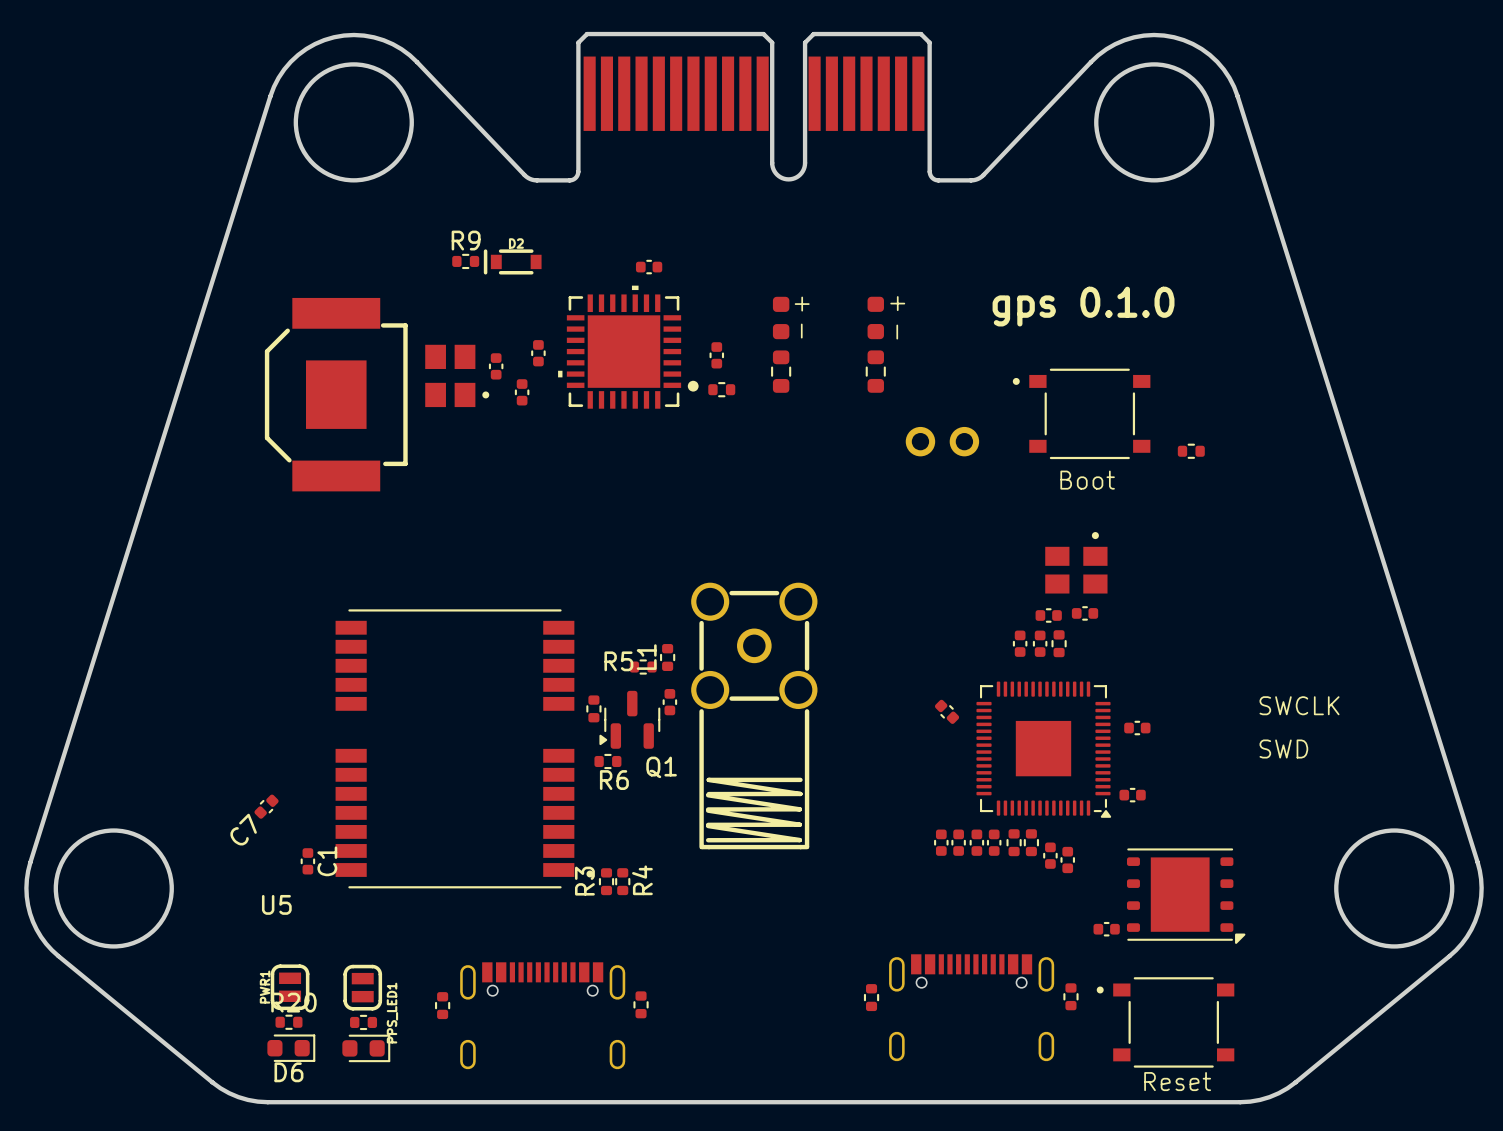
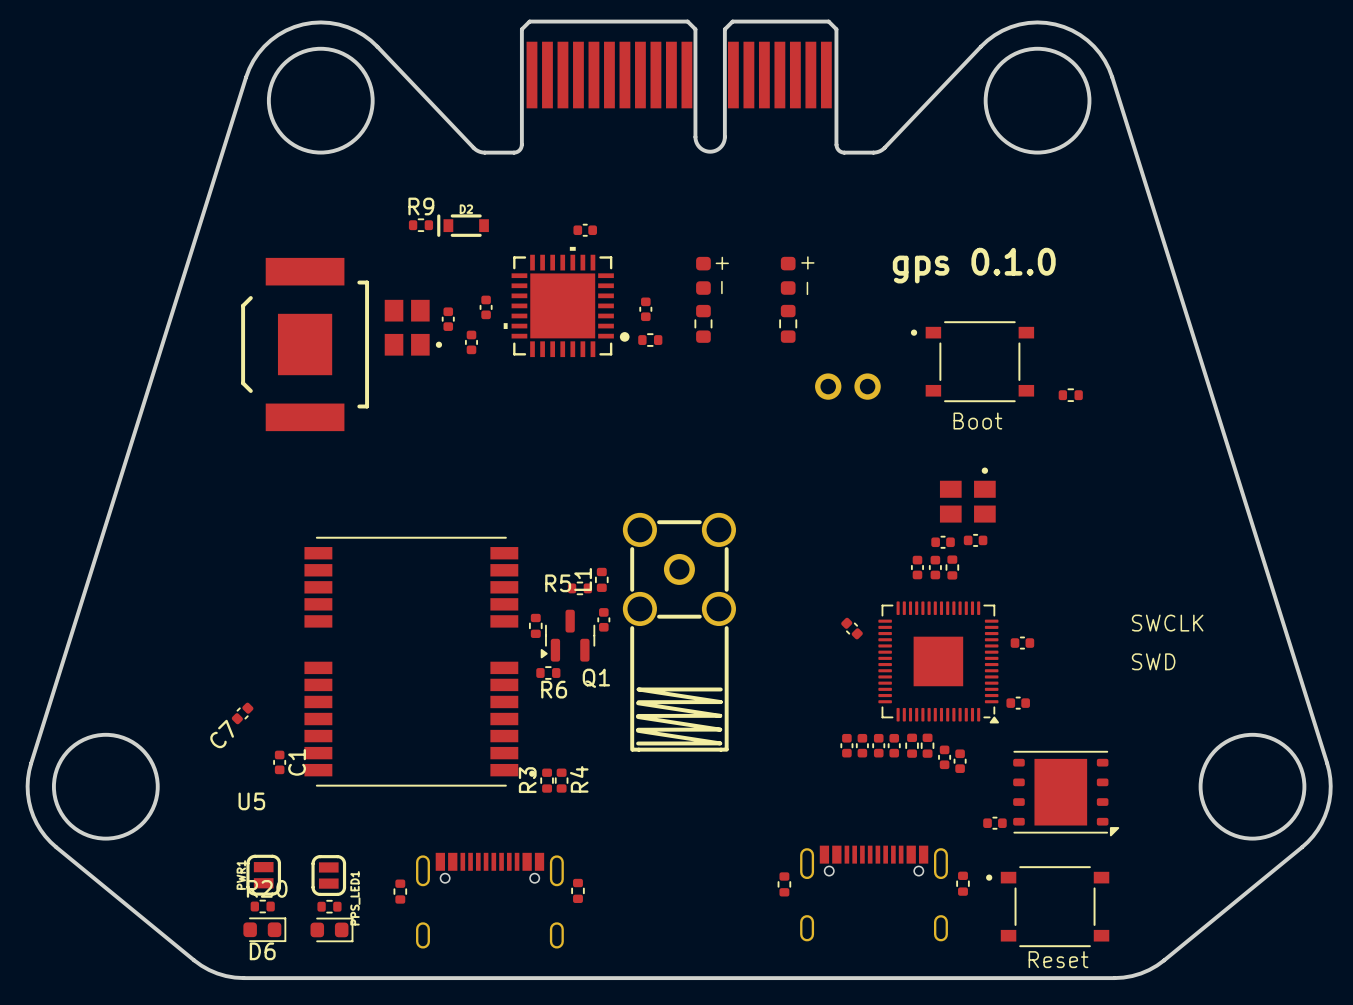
part footprint: [264, 297, 408, 492] -> [241, 257, 370, 432]

